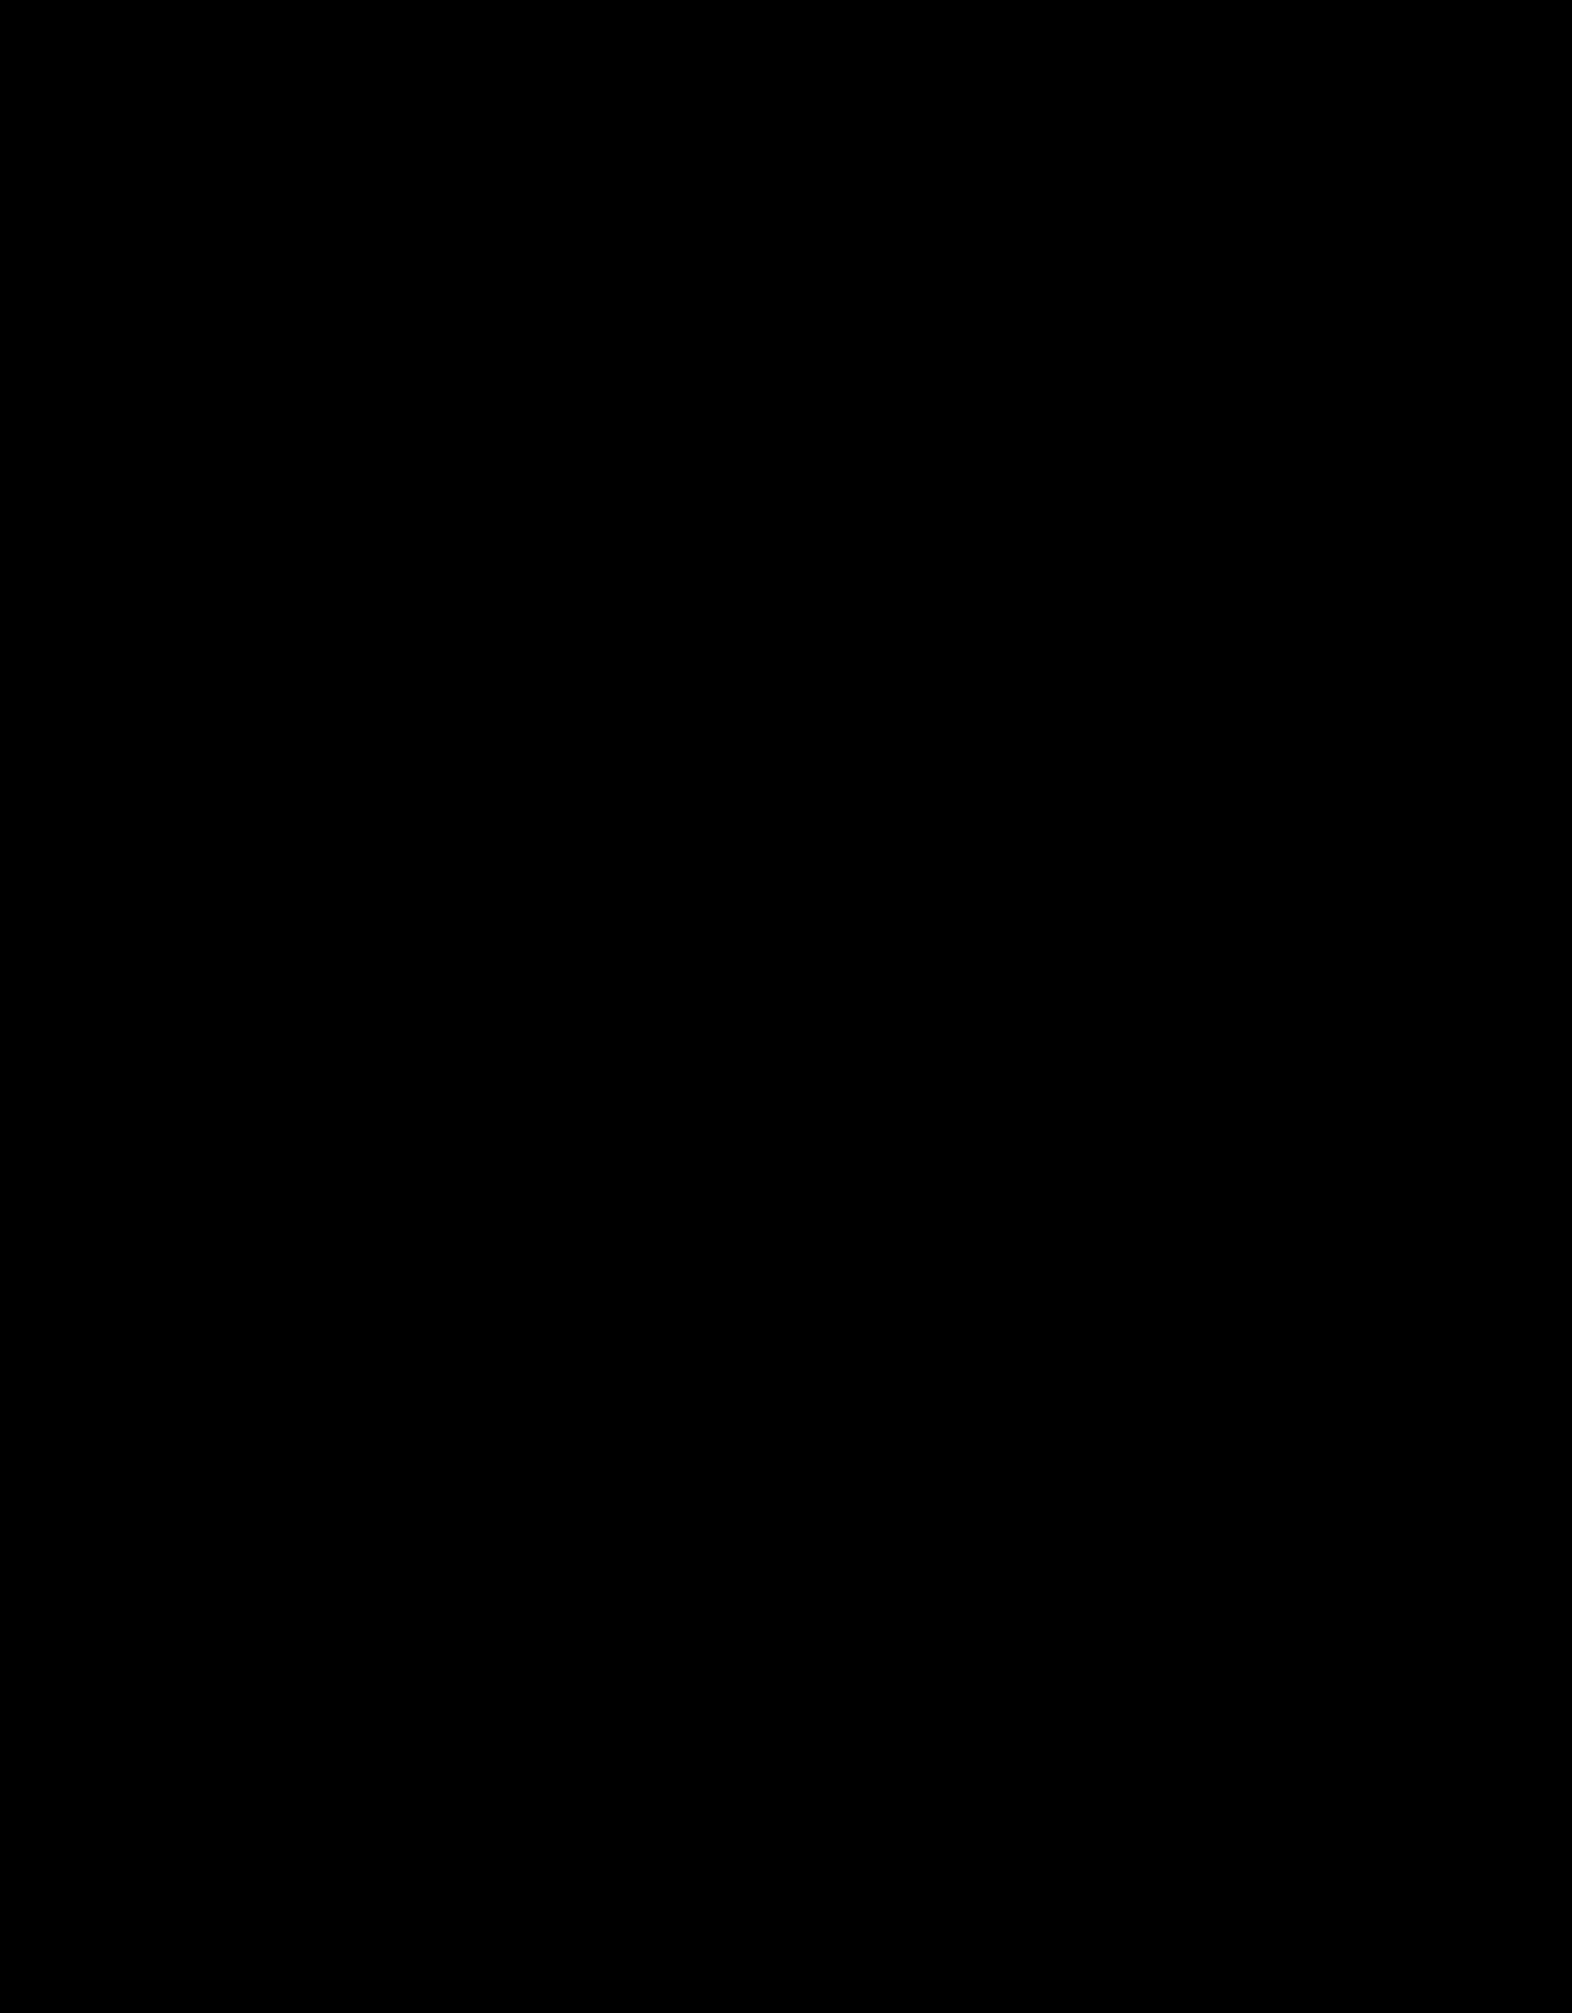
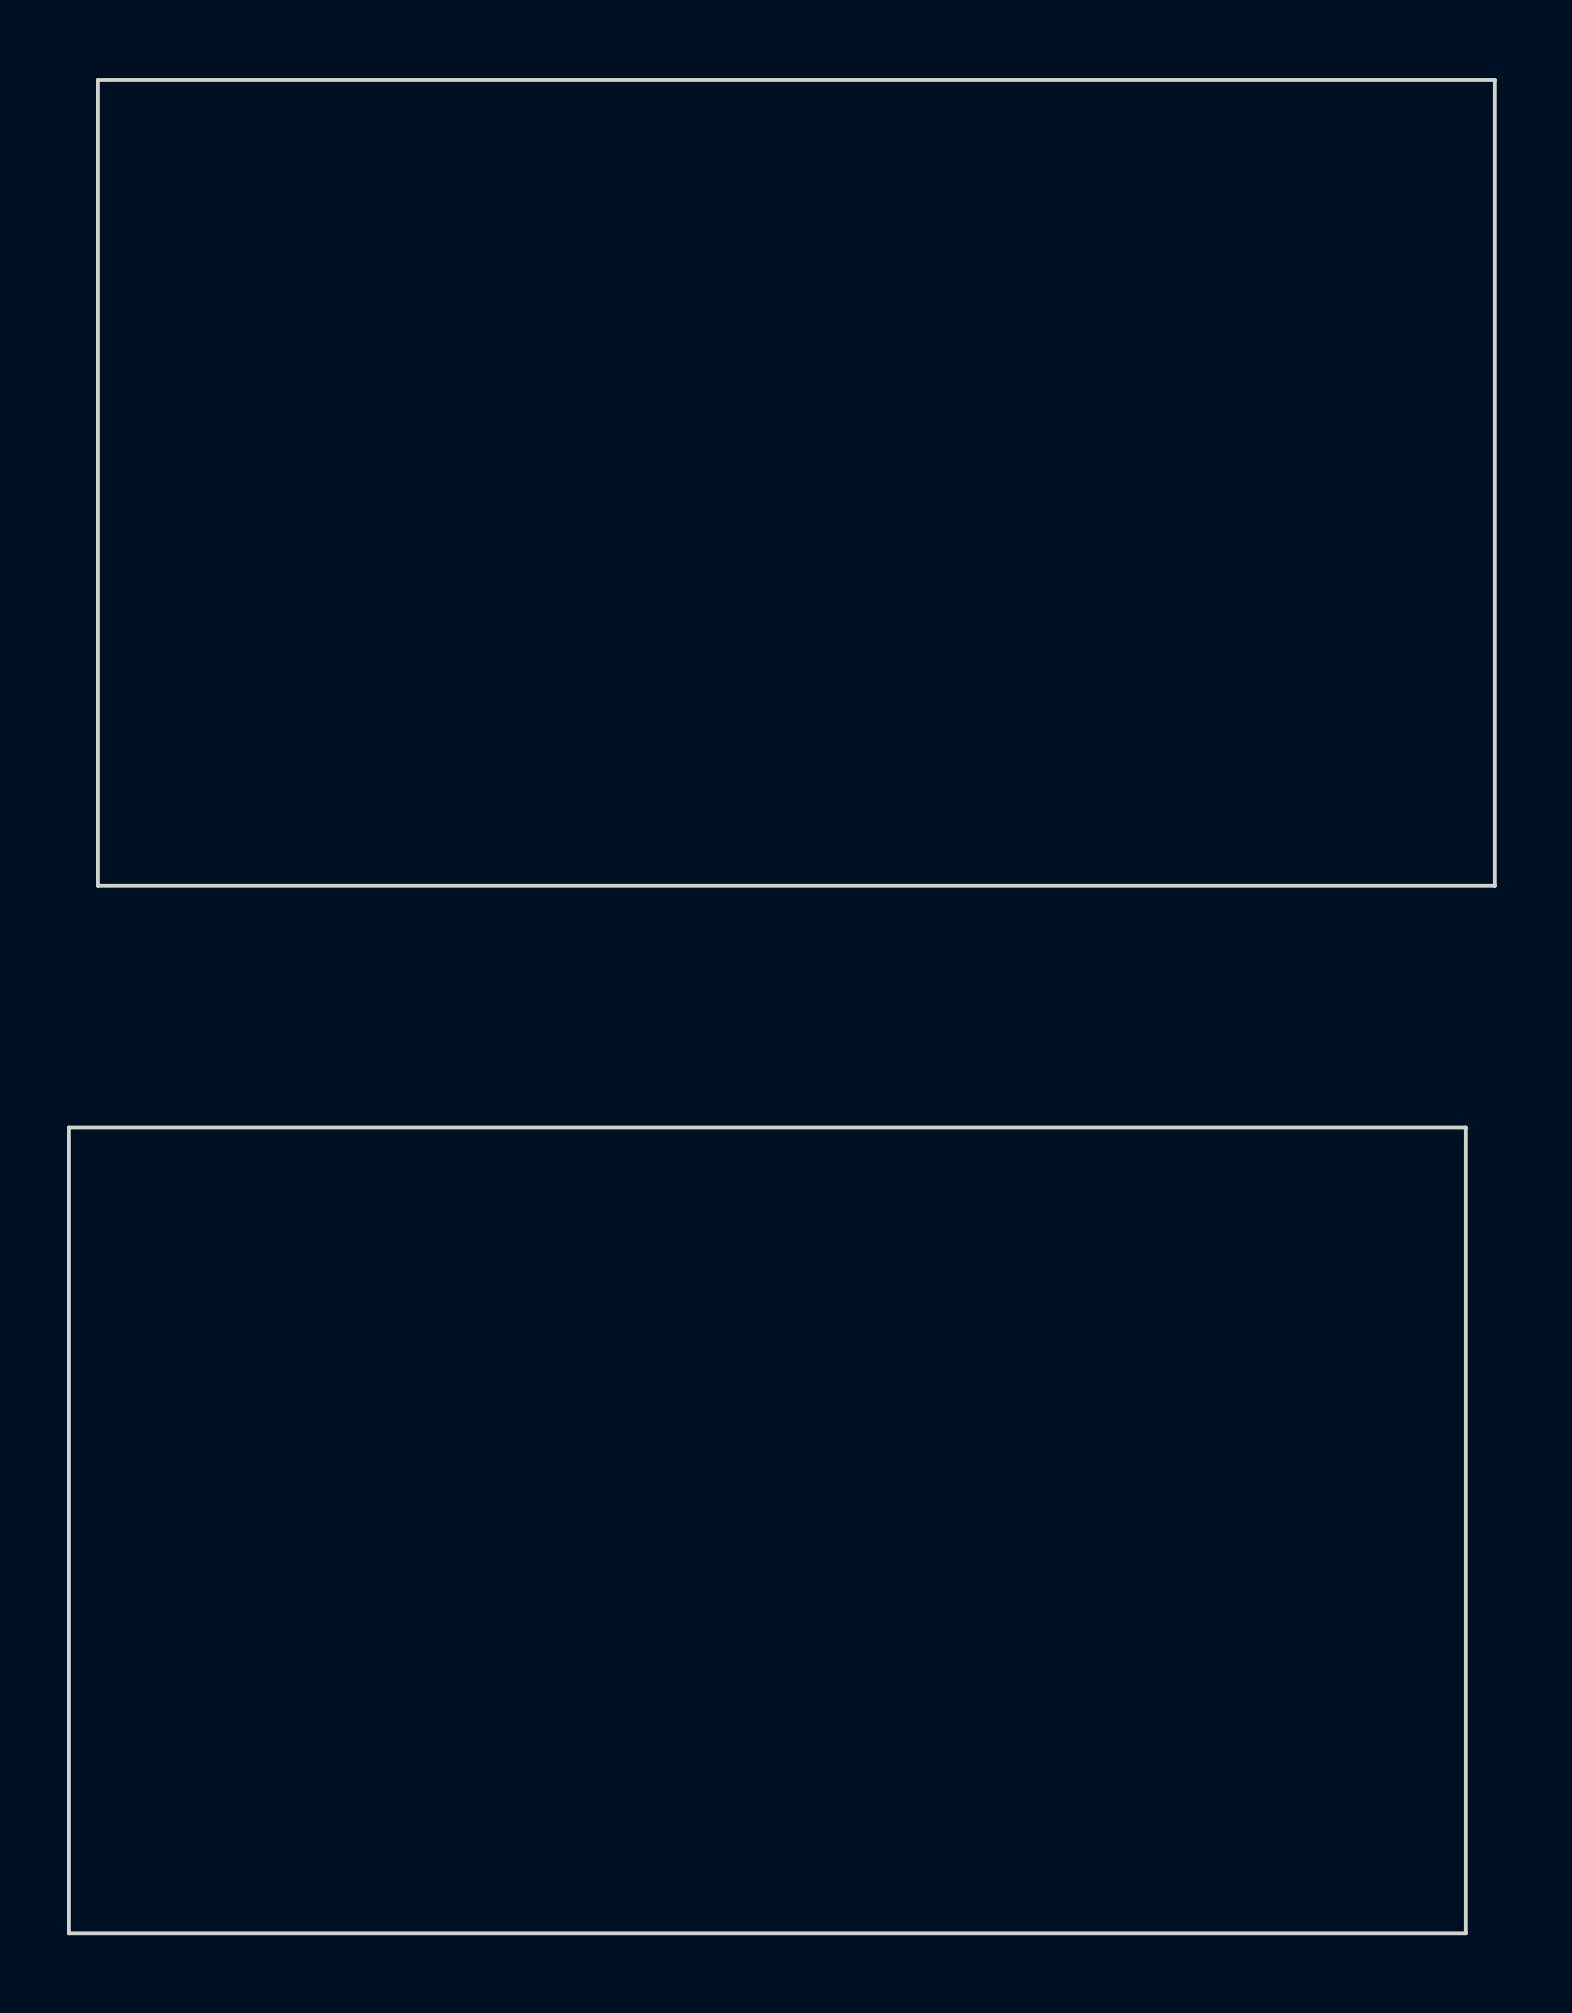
board edge: none -> (1494, 79) (97, 79) (97, 885) (1494, 885) (1494, 79)
board edge: none -> (1465, 1127) (68, 1127) (68, 1933) (1465, 1933) (1465, 1127)

